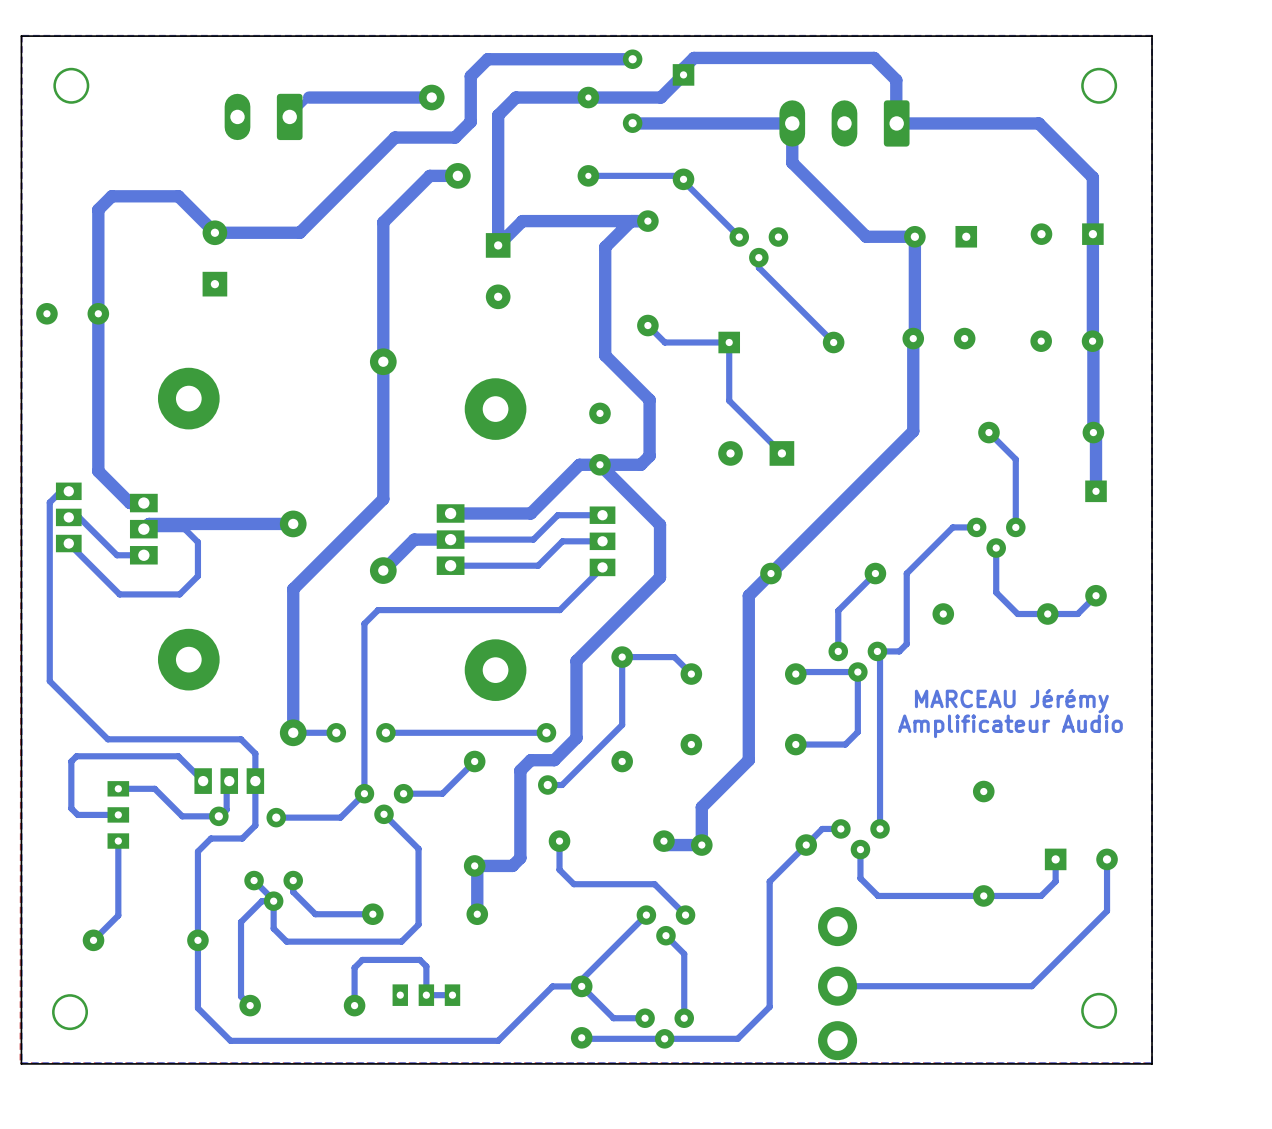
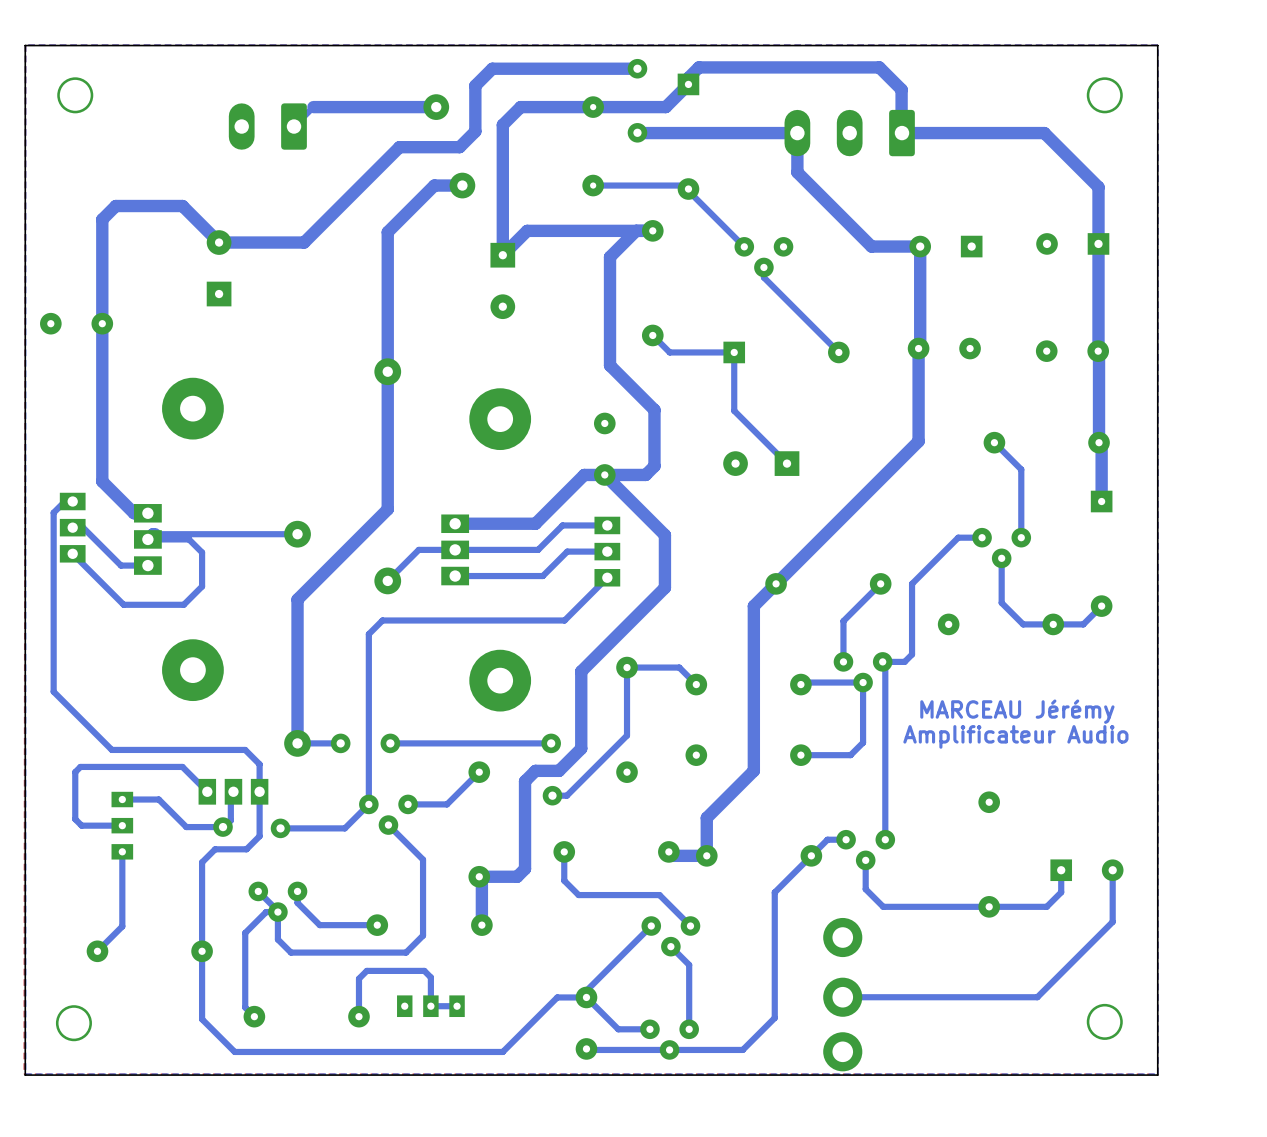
bottom track width: thick (293, 523) (150, 523) -> thin (297, 534) (155, 534)
bottom track width: thick (450, 539) (414, 539) (383, 570) -> thin (455, 549) (418, 549) (387, 580)

